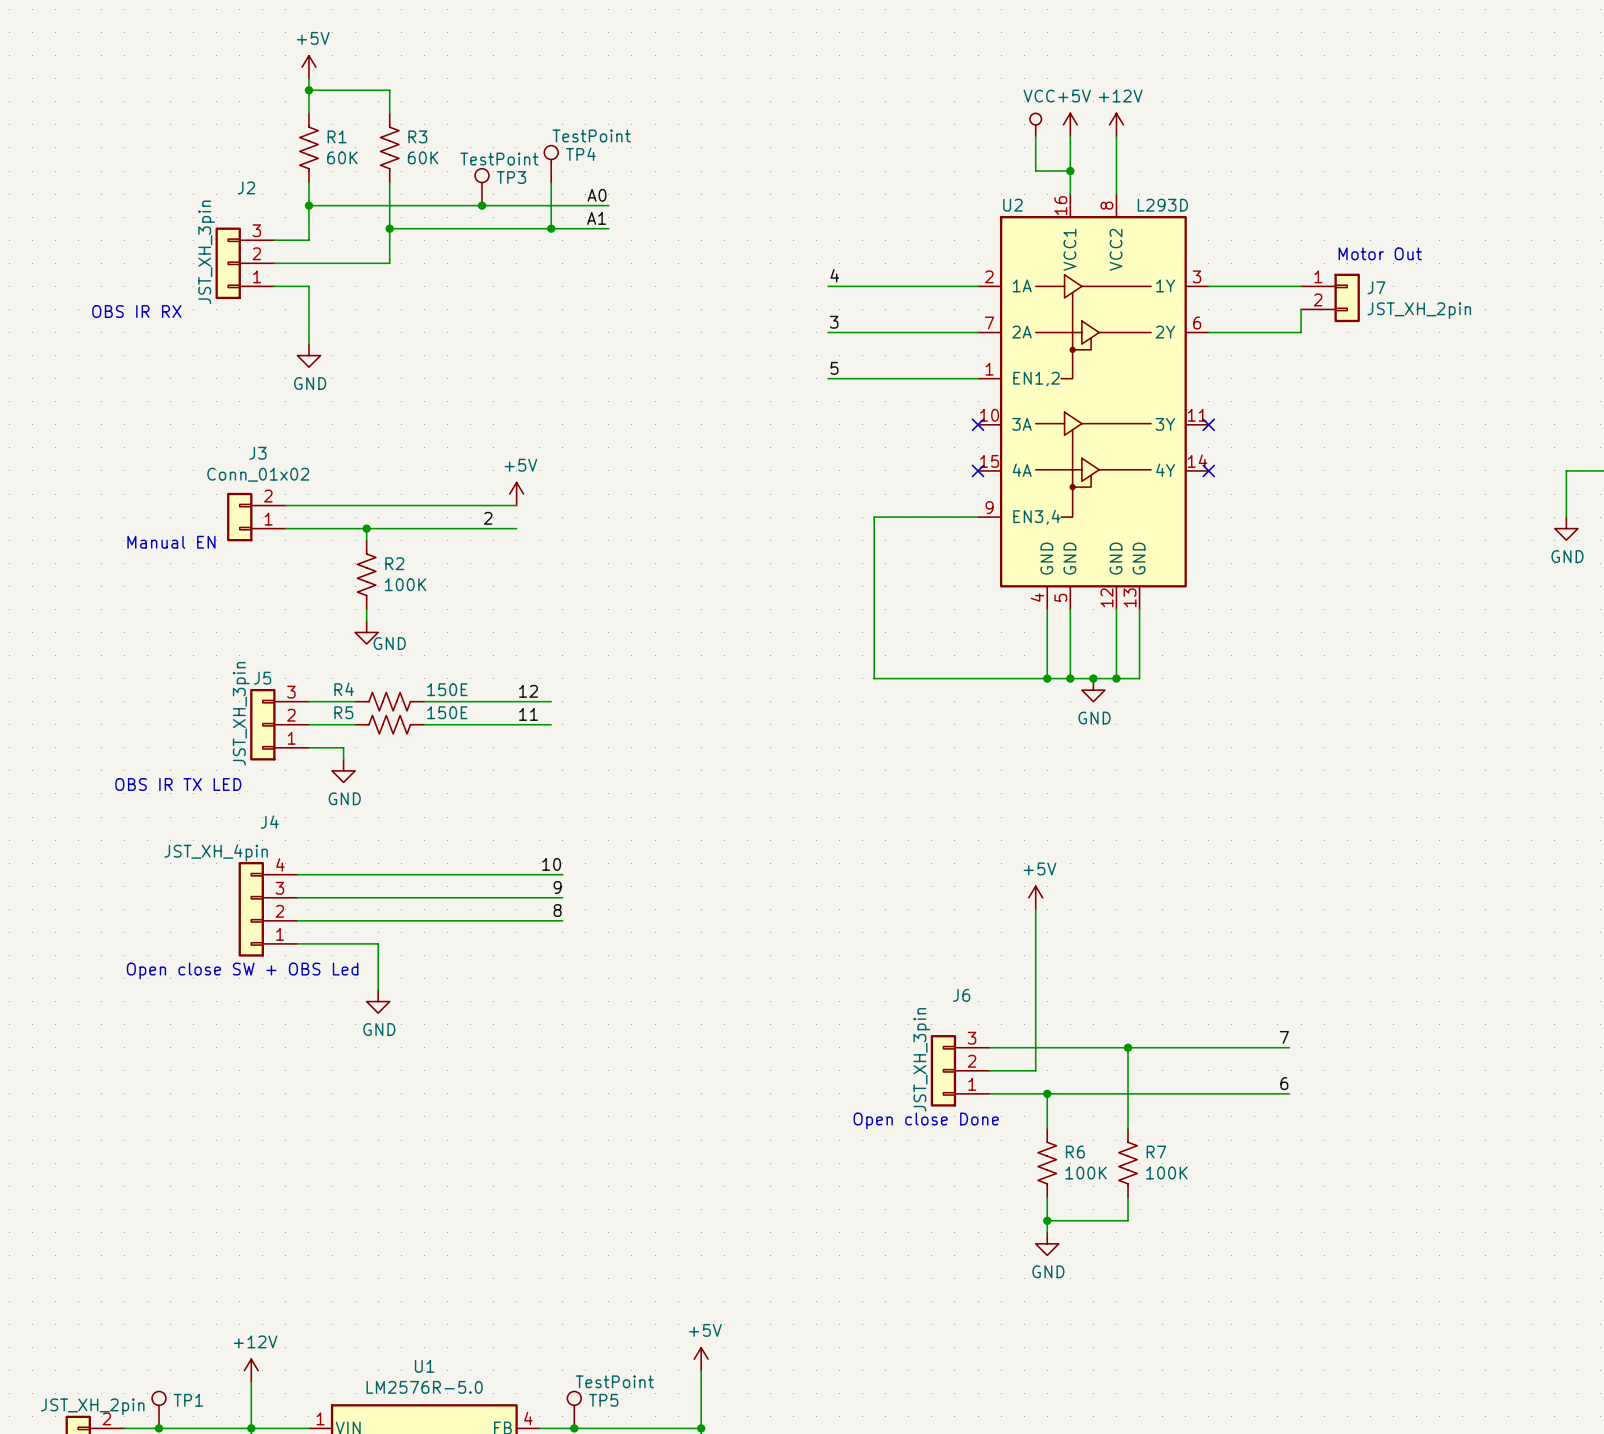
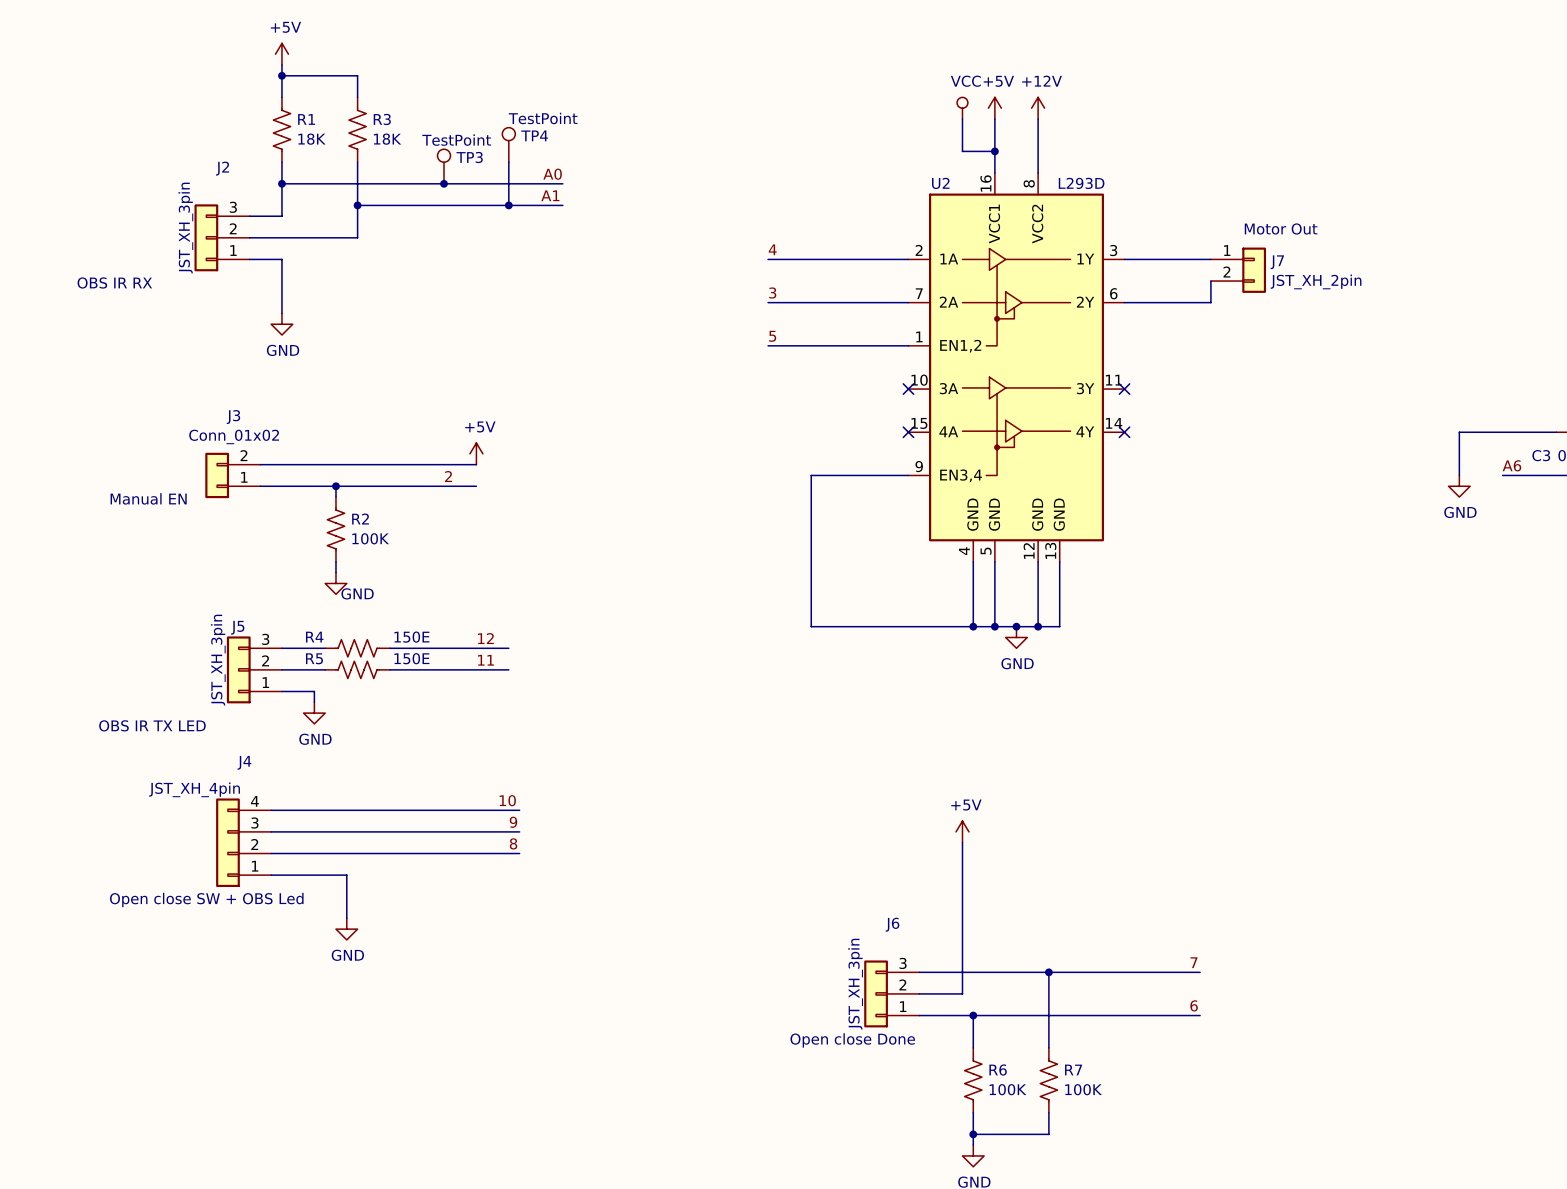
R1 value: 60K (342, 157) -> 18K (311, 139)
R3 value: 60K (423, 157) -> 18K (387, 139)

